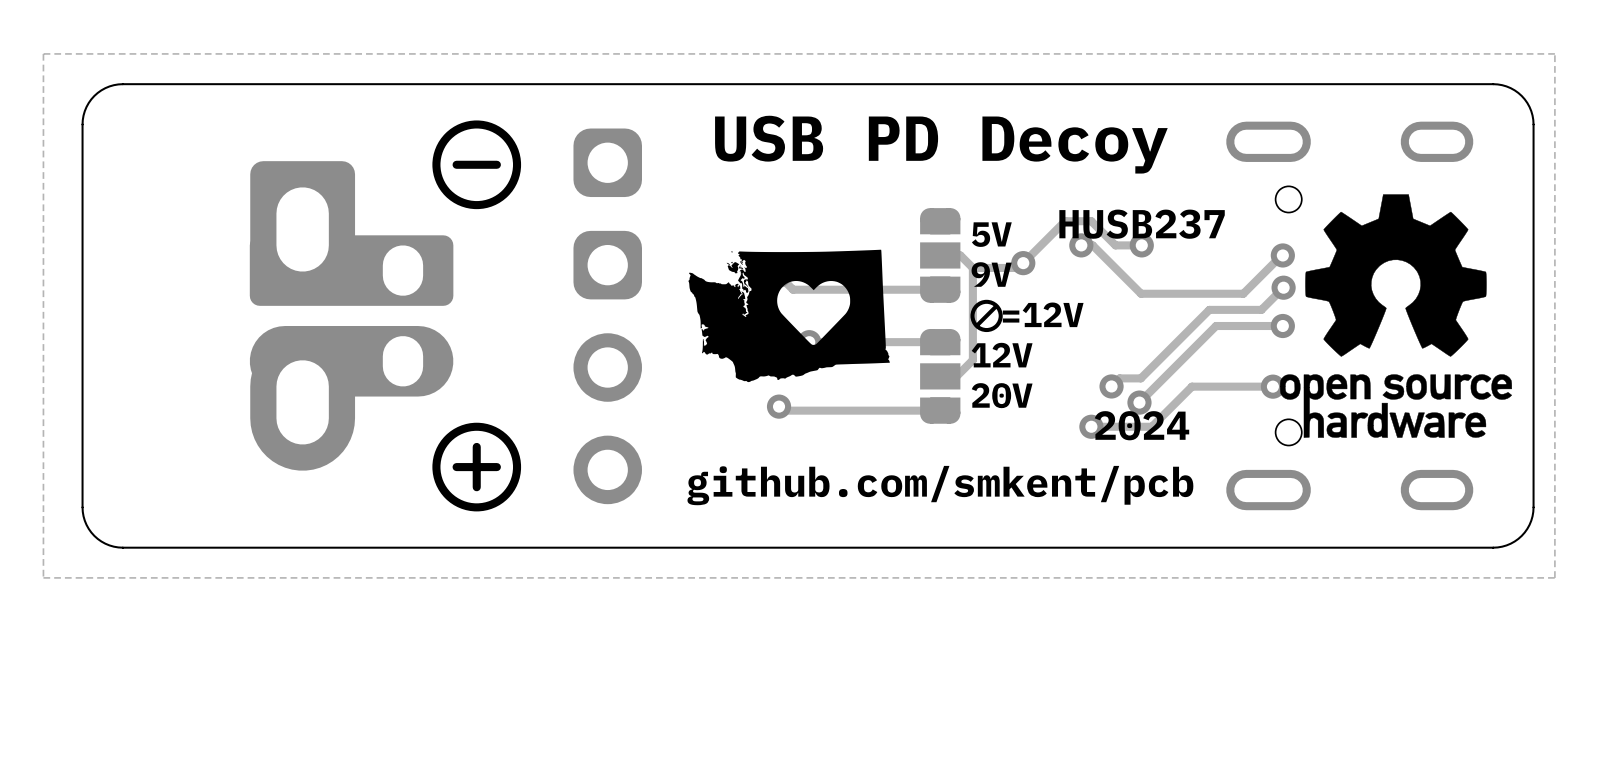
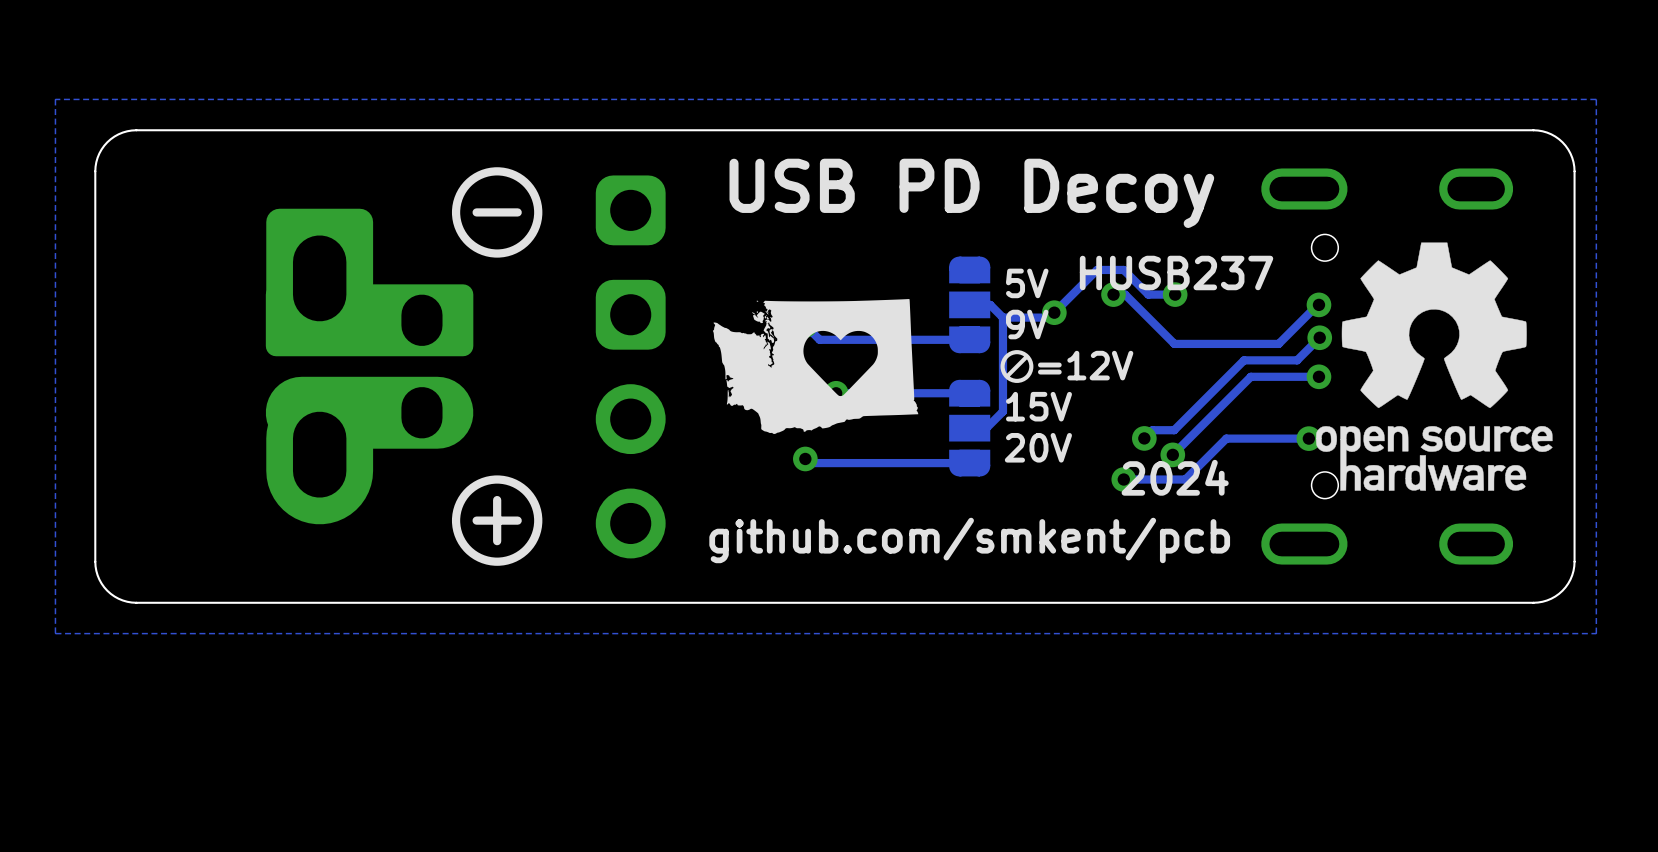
text: 12V (1002, 355) -> 15V (1038, 406)

